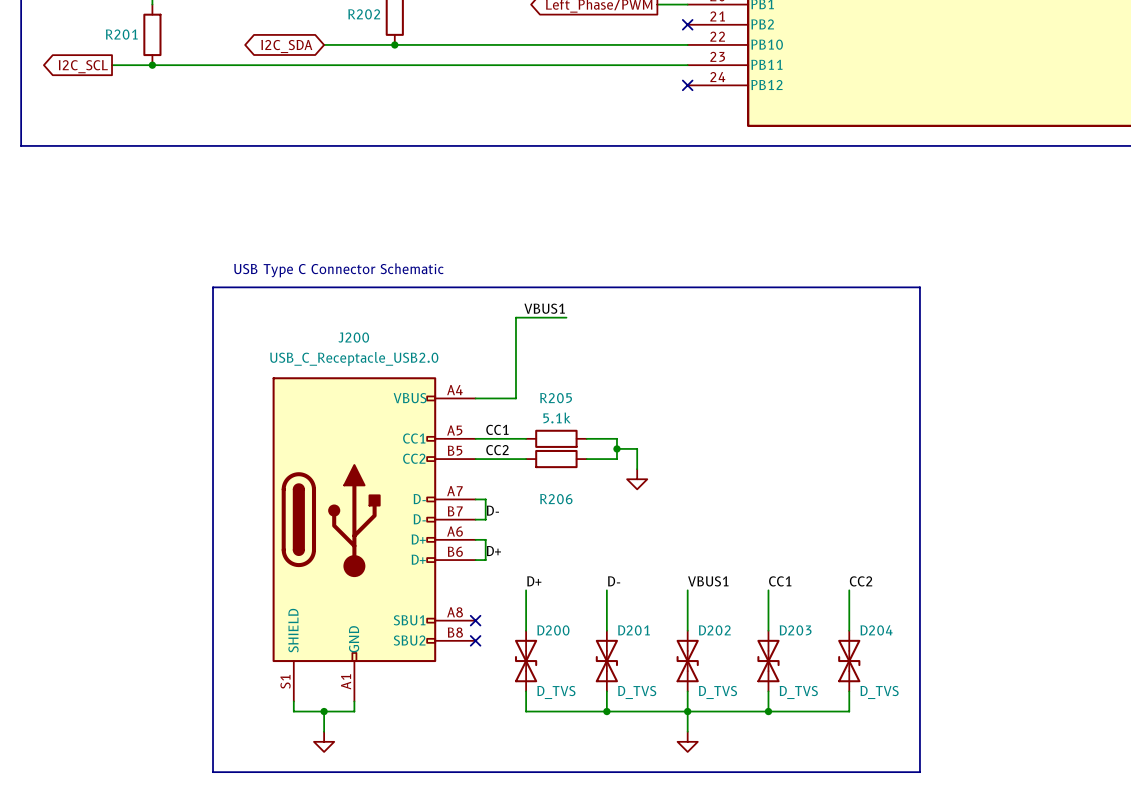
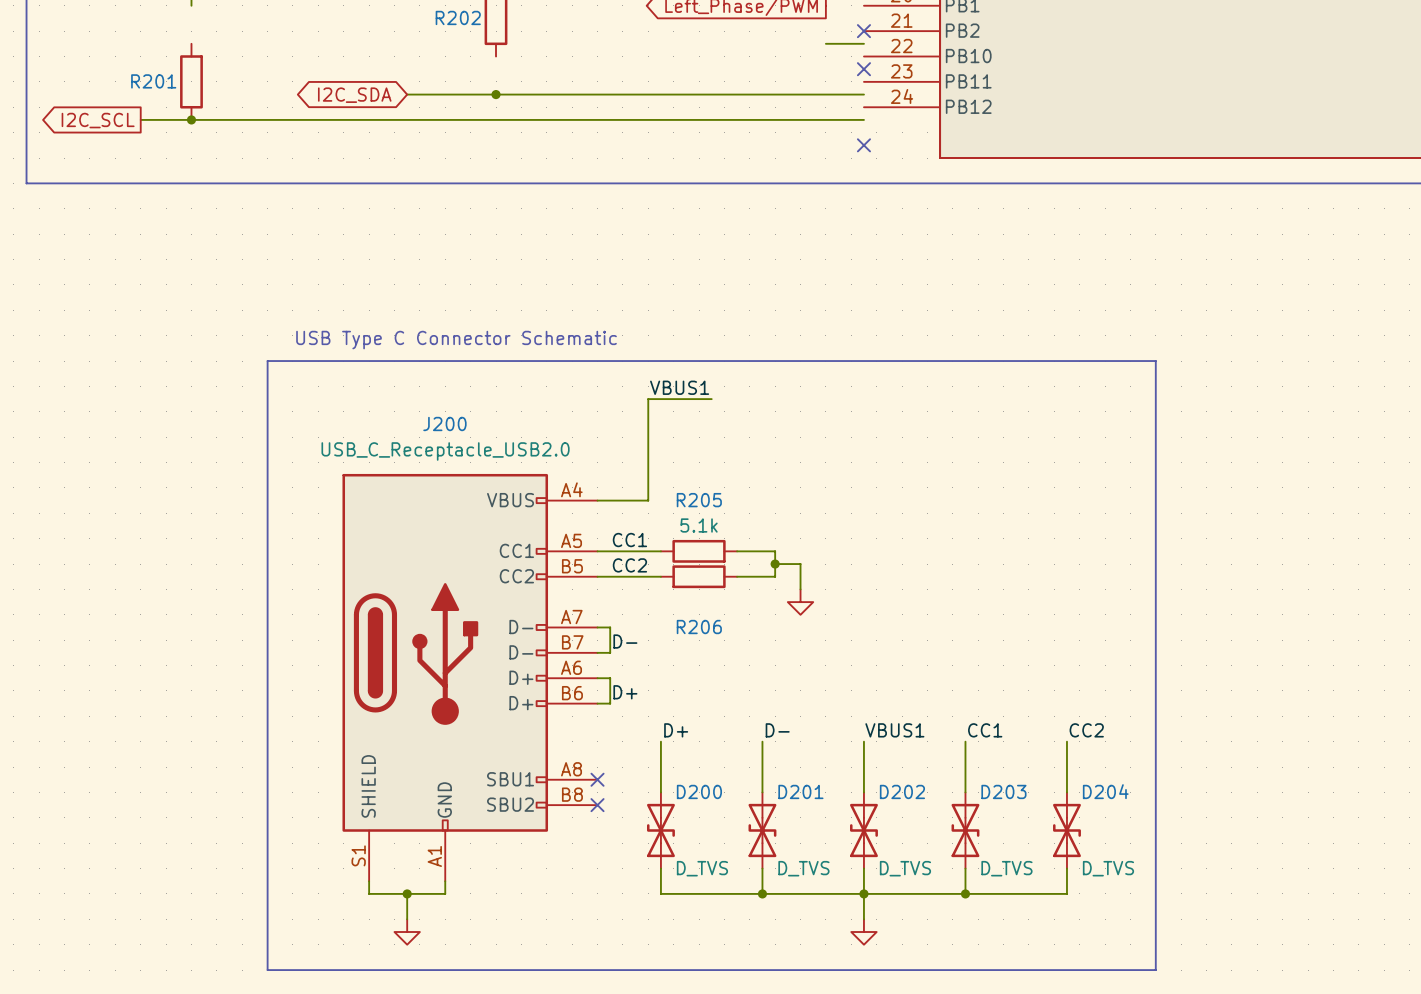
wire: (657, 4) (687, 4) -> (825, 43) (863, 43)
R201 position: (152, 34) -> (191, 81)
wire: (324, 44) (687, 44) -> (407, 94) (863, 94)
junction position: (394, 44) -> (496, 94)
global label position: I2C_SDA (286, 46) -> I2C_SDA (354, 95)
no-connect mark: none -> (863, 69)
wire: (112, 65) (687, 65) -> (140, 119) (863, 119)
junction position: (152, 65) -> (191, 119)
global label position: I2C_SCL (83, 66) -> I2C_SCL (98, 120)
no-connect mark: (687, 85) -> none
no-connect mark: none -> (863, 145)

